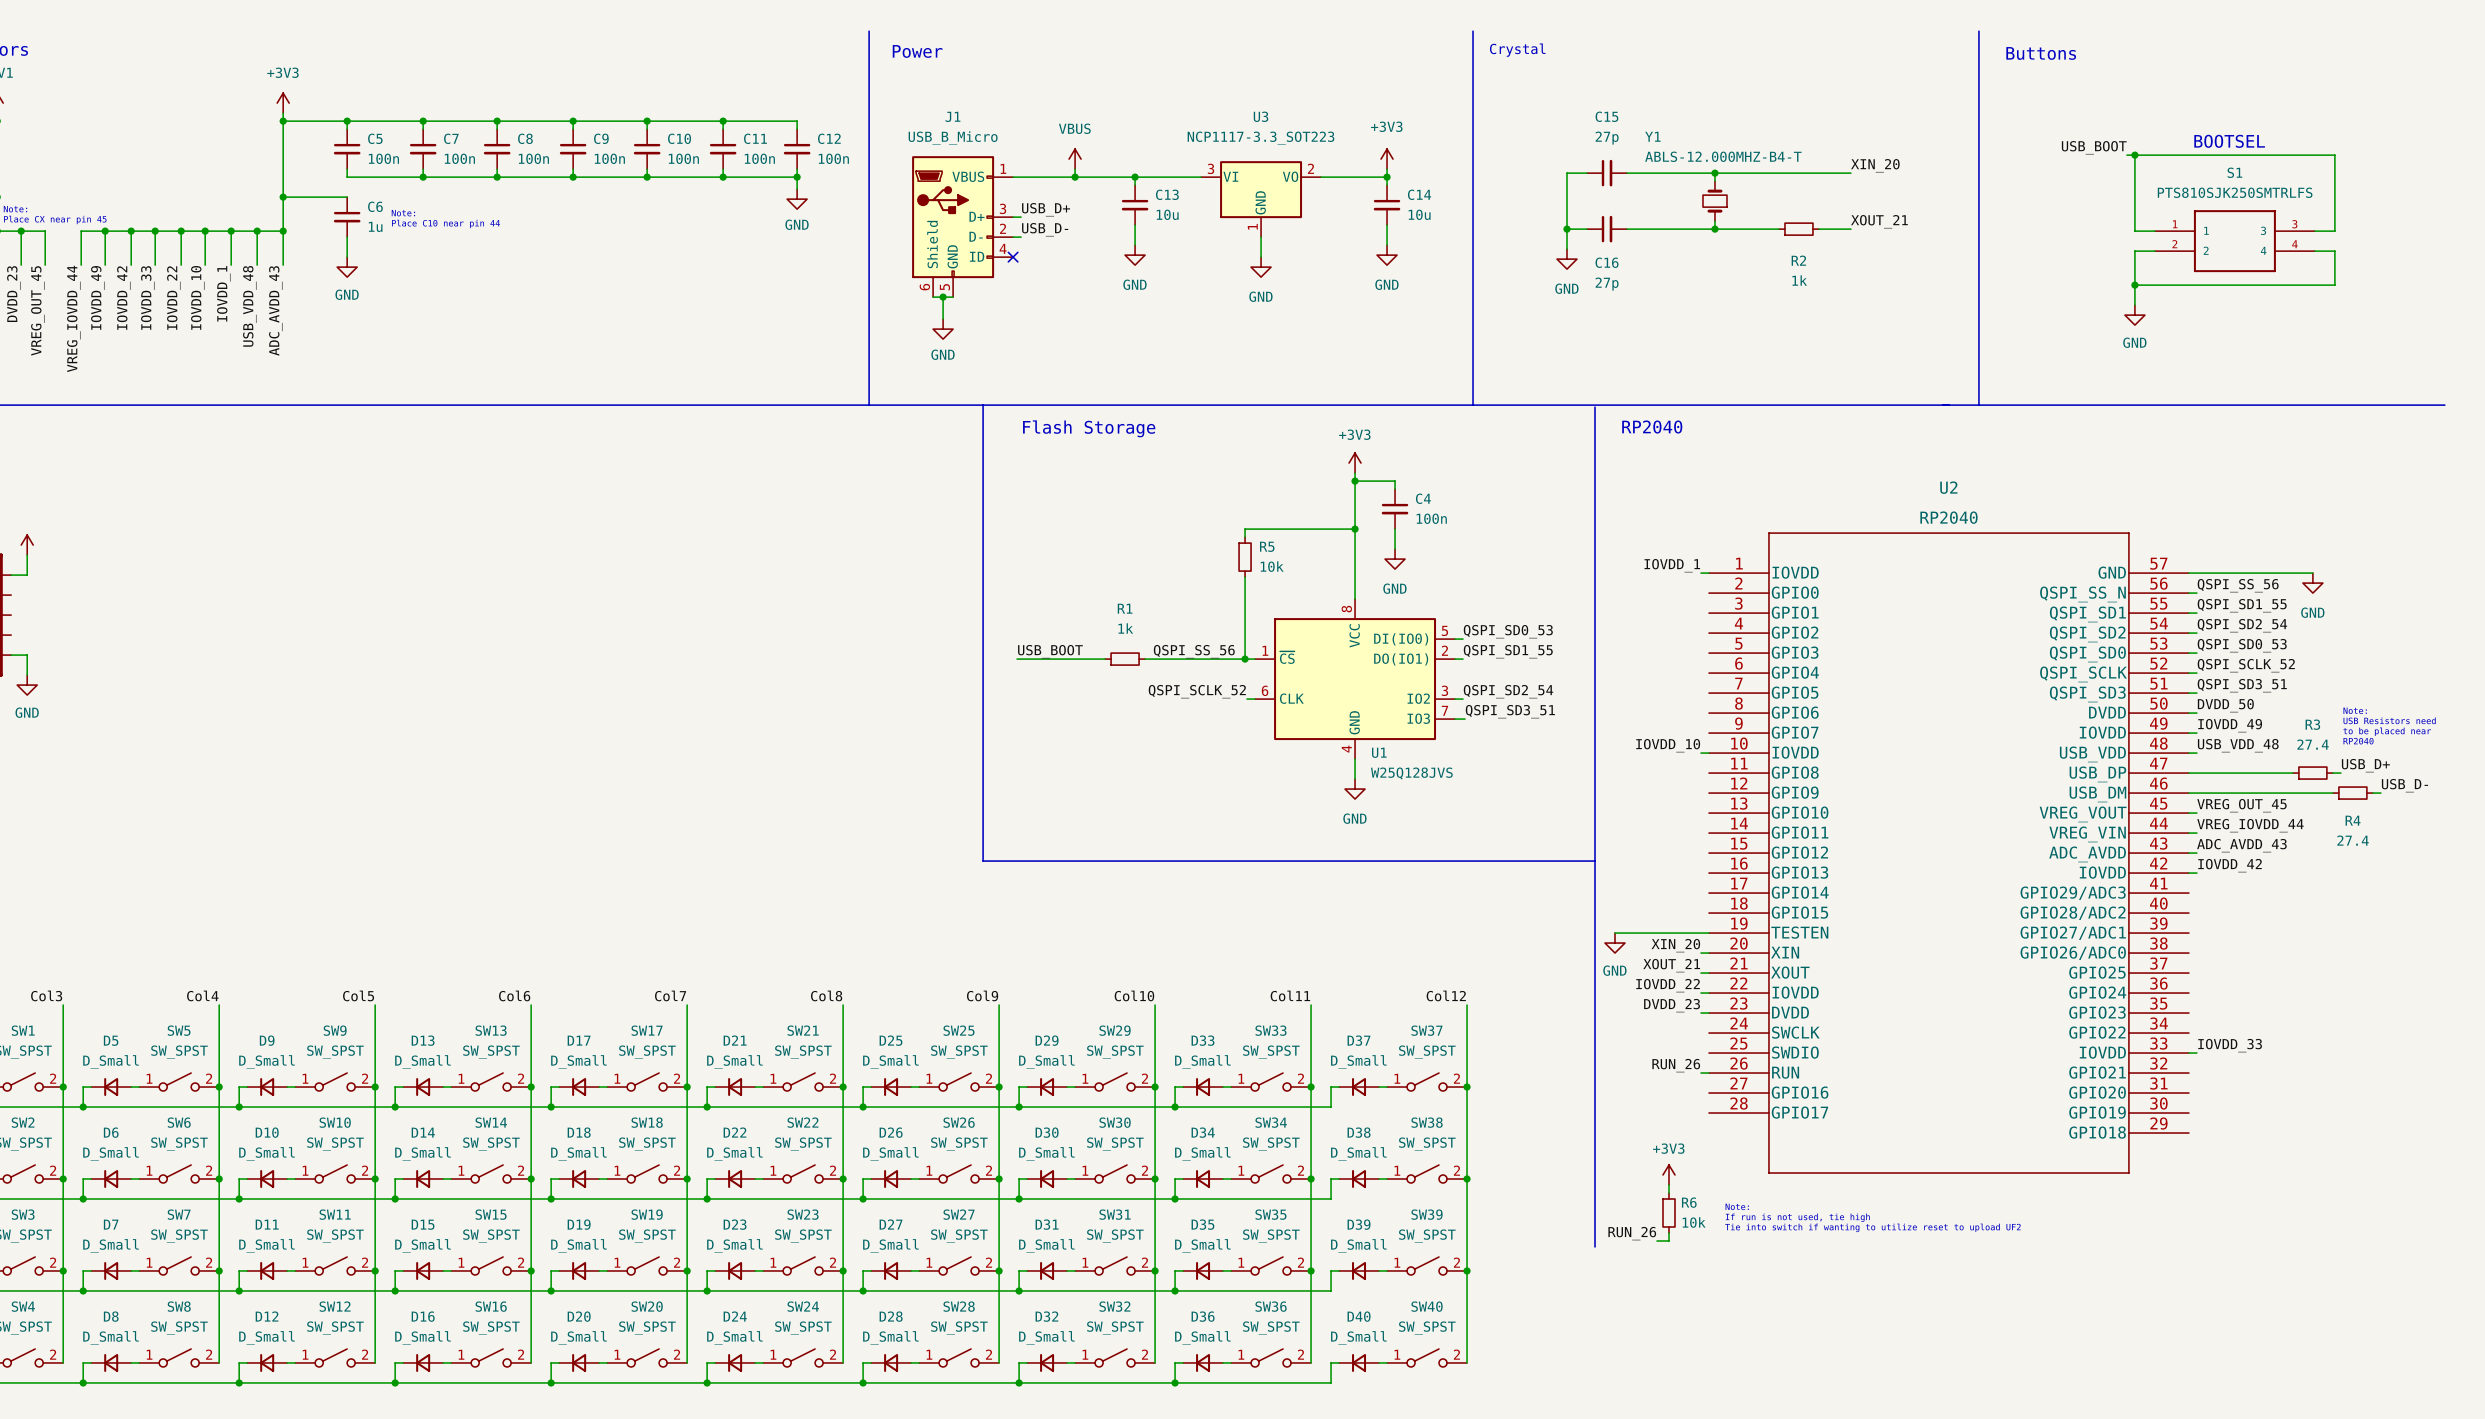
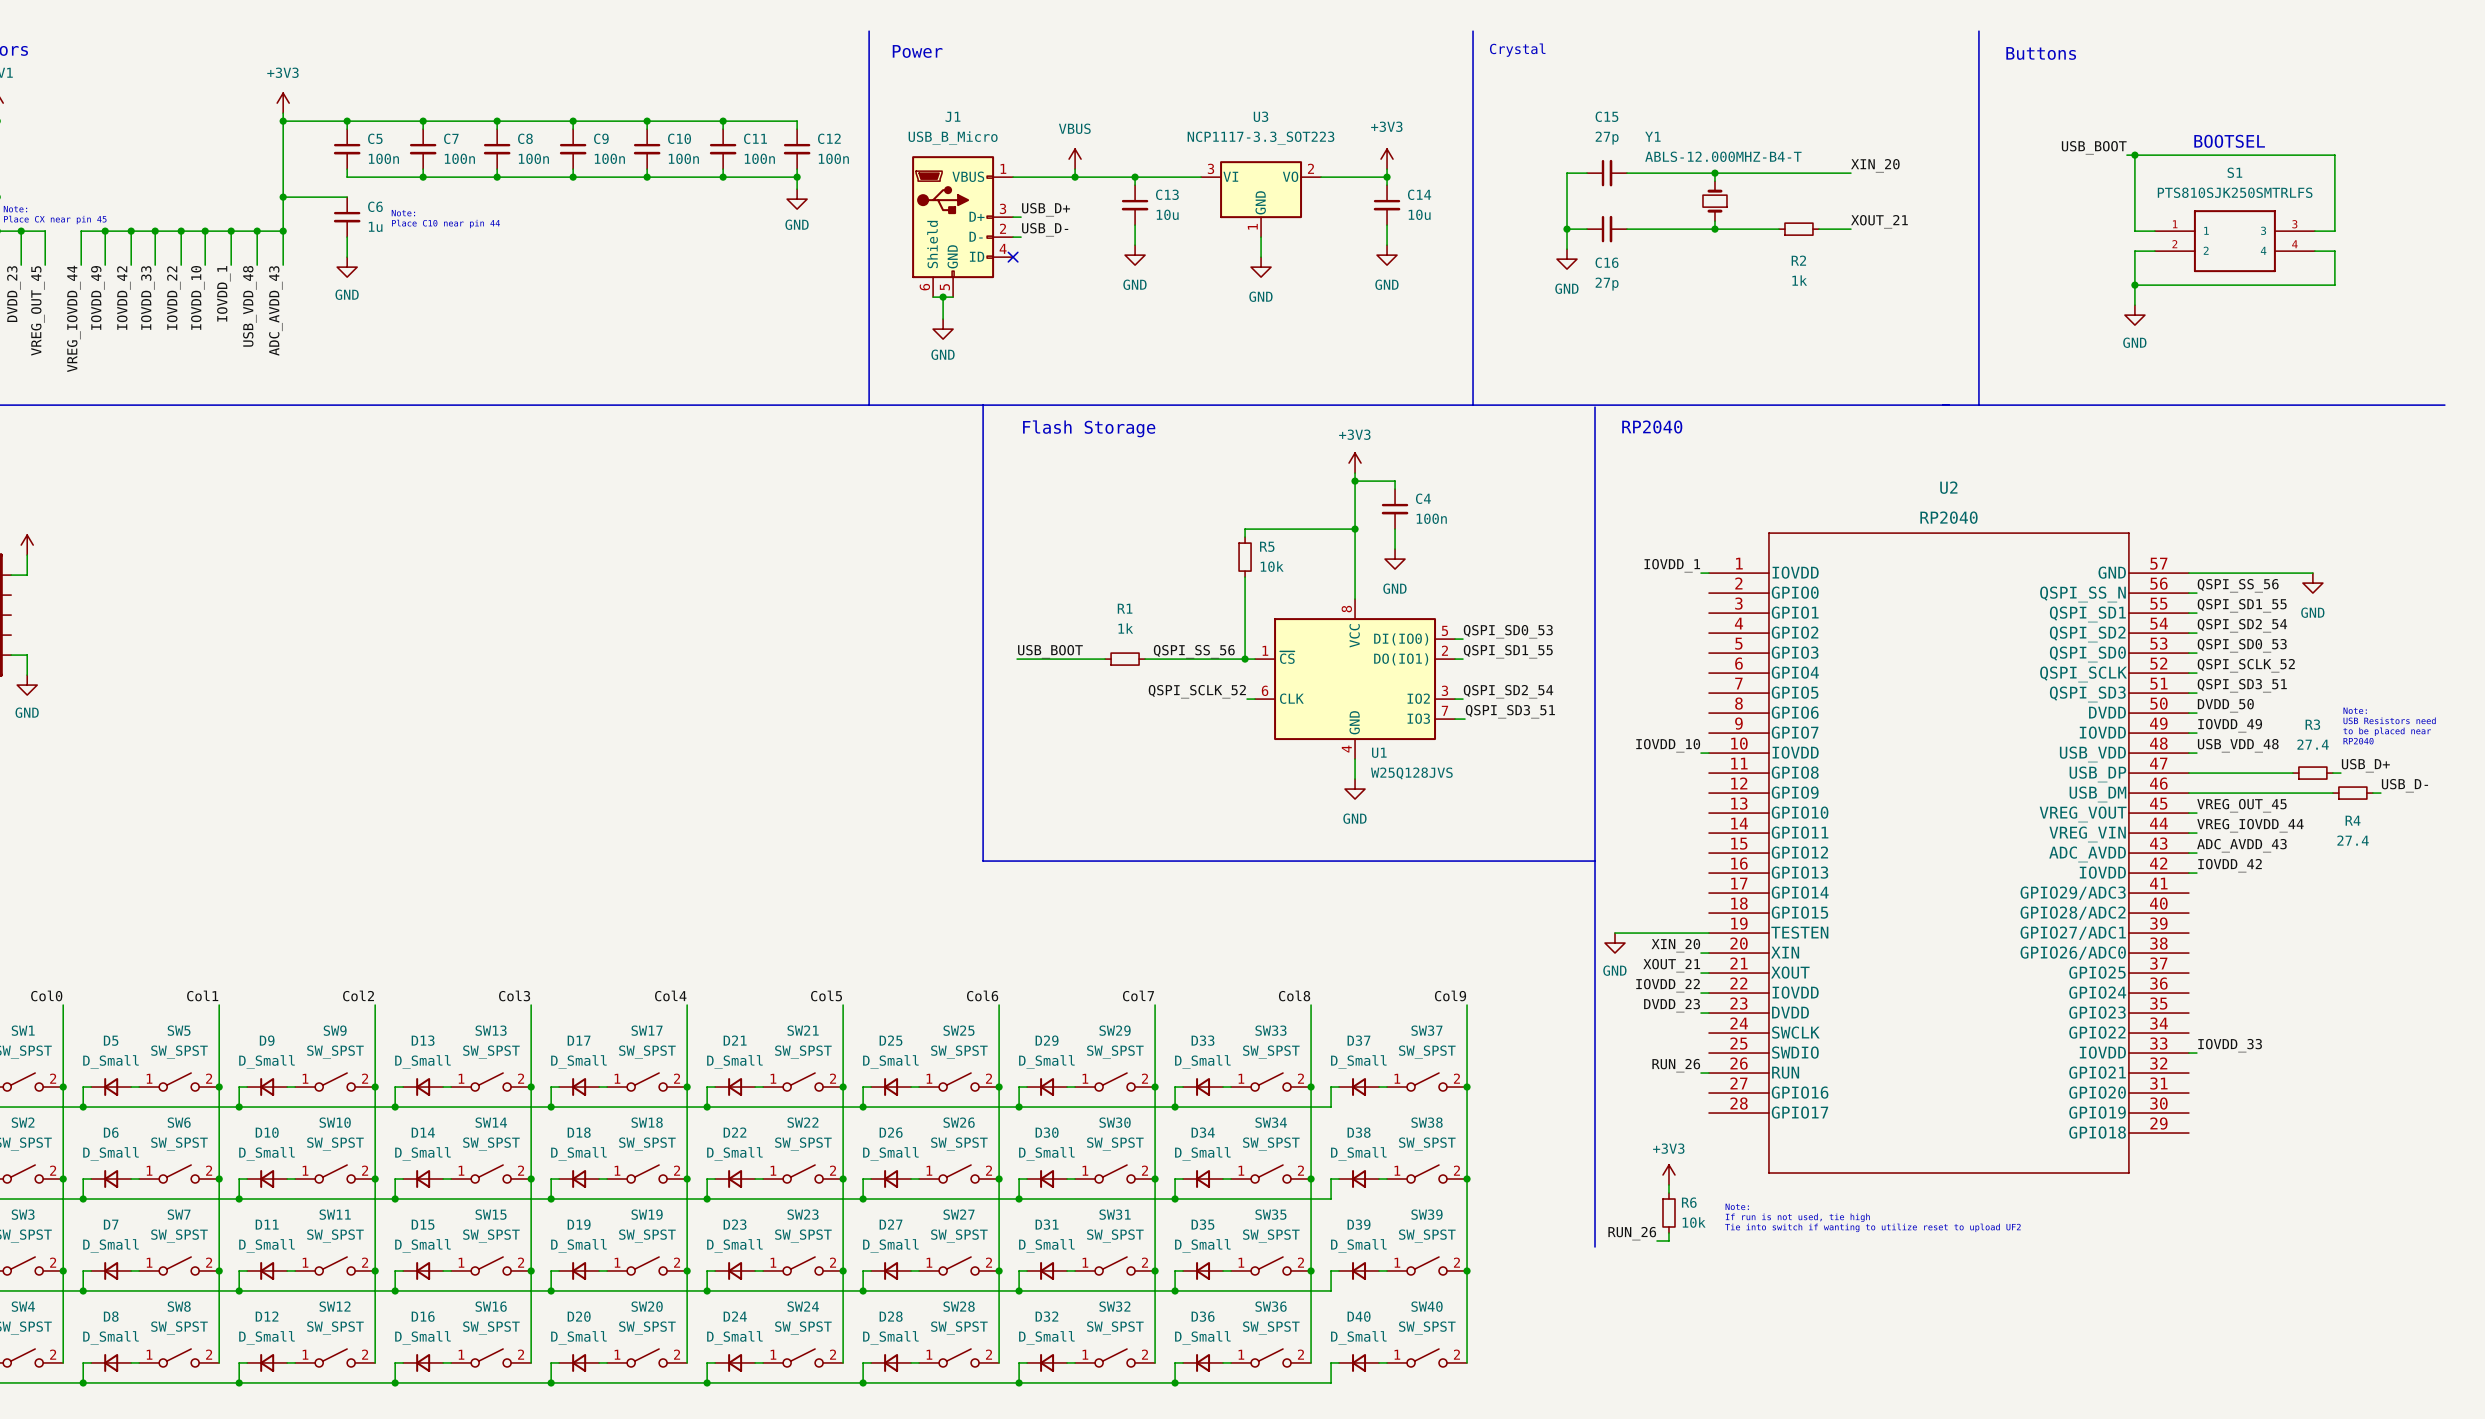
label: Col3 (46, 995) -> Col0 (46, 995)
label: Col4 (202, 995) -> Col1 (202, 995)
label: Col5 (358, 995) -> Col2 (358, 995)
label: Col6 (514, 995) -> Col3 (514, 995)
label: Col7 (670, 995) -> Col4 (670, 995)
label: Col8 (826, 995) -> Col5 (826, 995)
label: Col9 (982, 995) -> Col6 (982, 995)
label: Col10 (1134, 995) -> Col7 (1138, 995)
label: Col11 (1290, 995) -> Col8 (1294, 995)
label: Col12 (1446, 995) -> Col9 (1450, 995)

